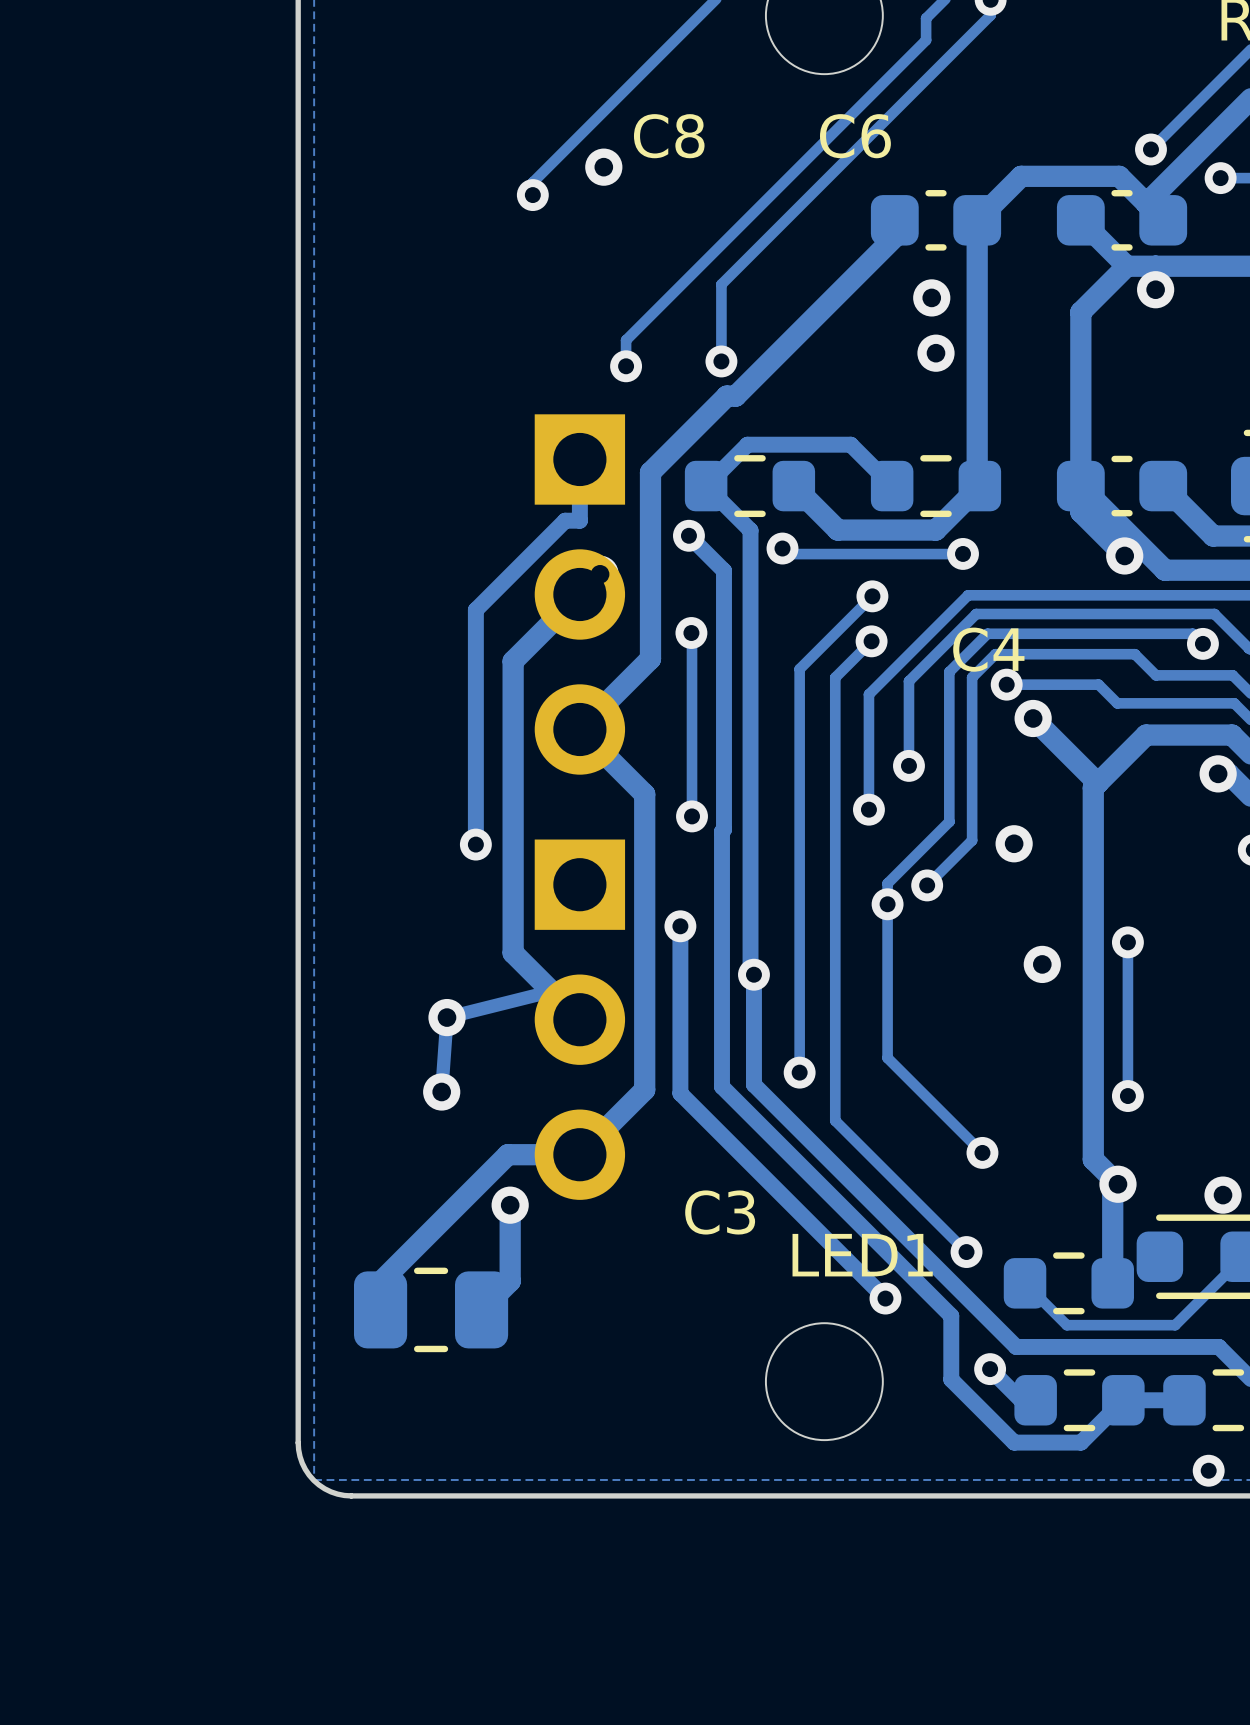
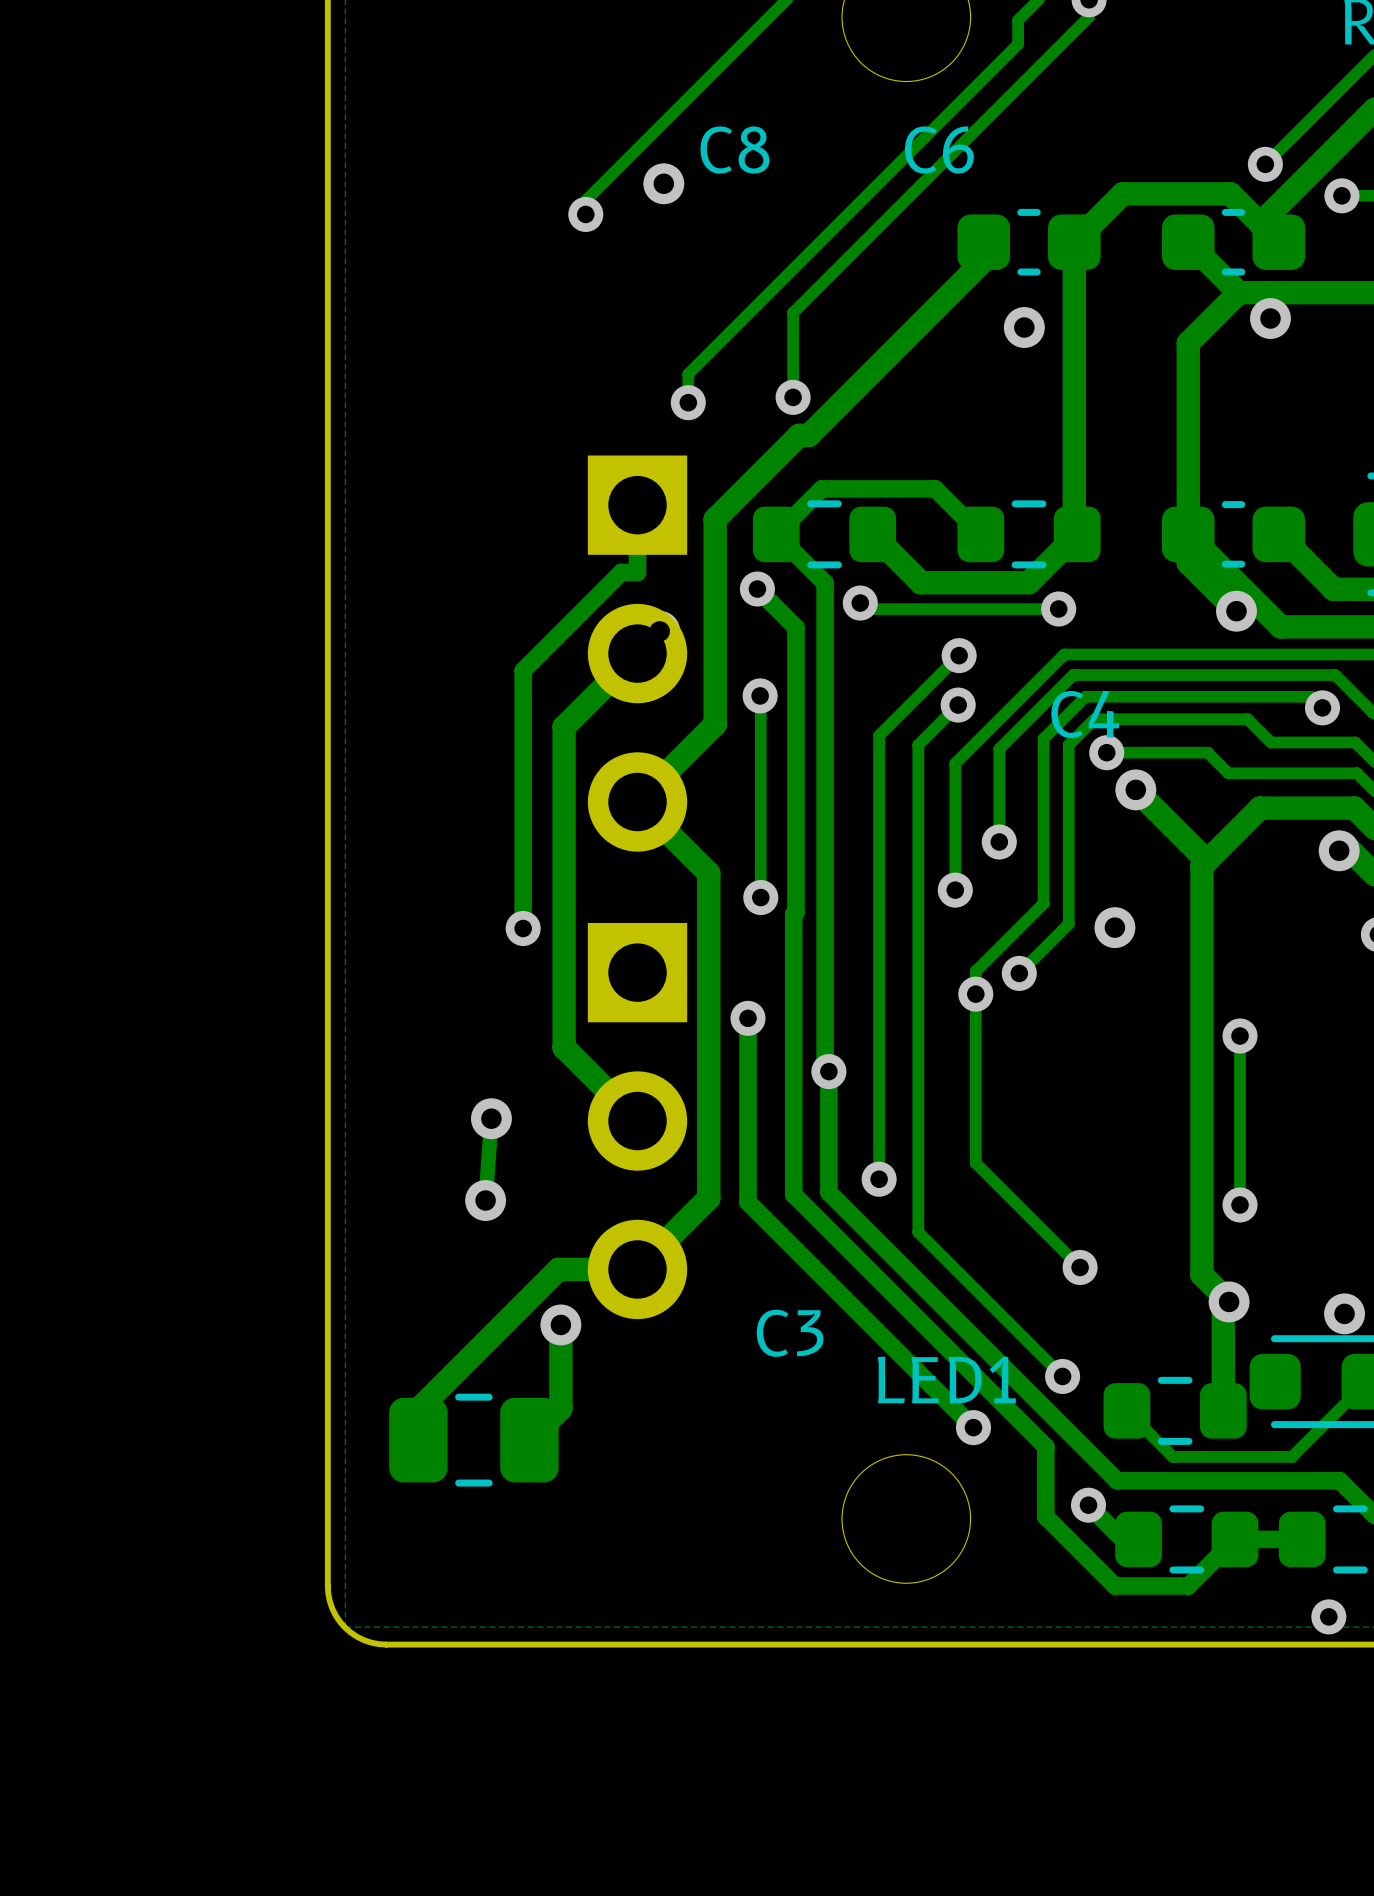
via: (936, 353) -> none
via: (1042, 964) -> none
track: (553, 991) (447, 1017) -> none

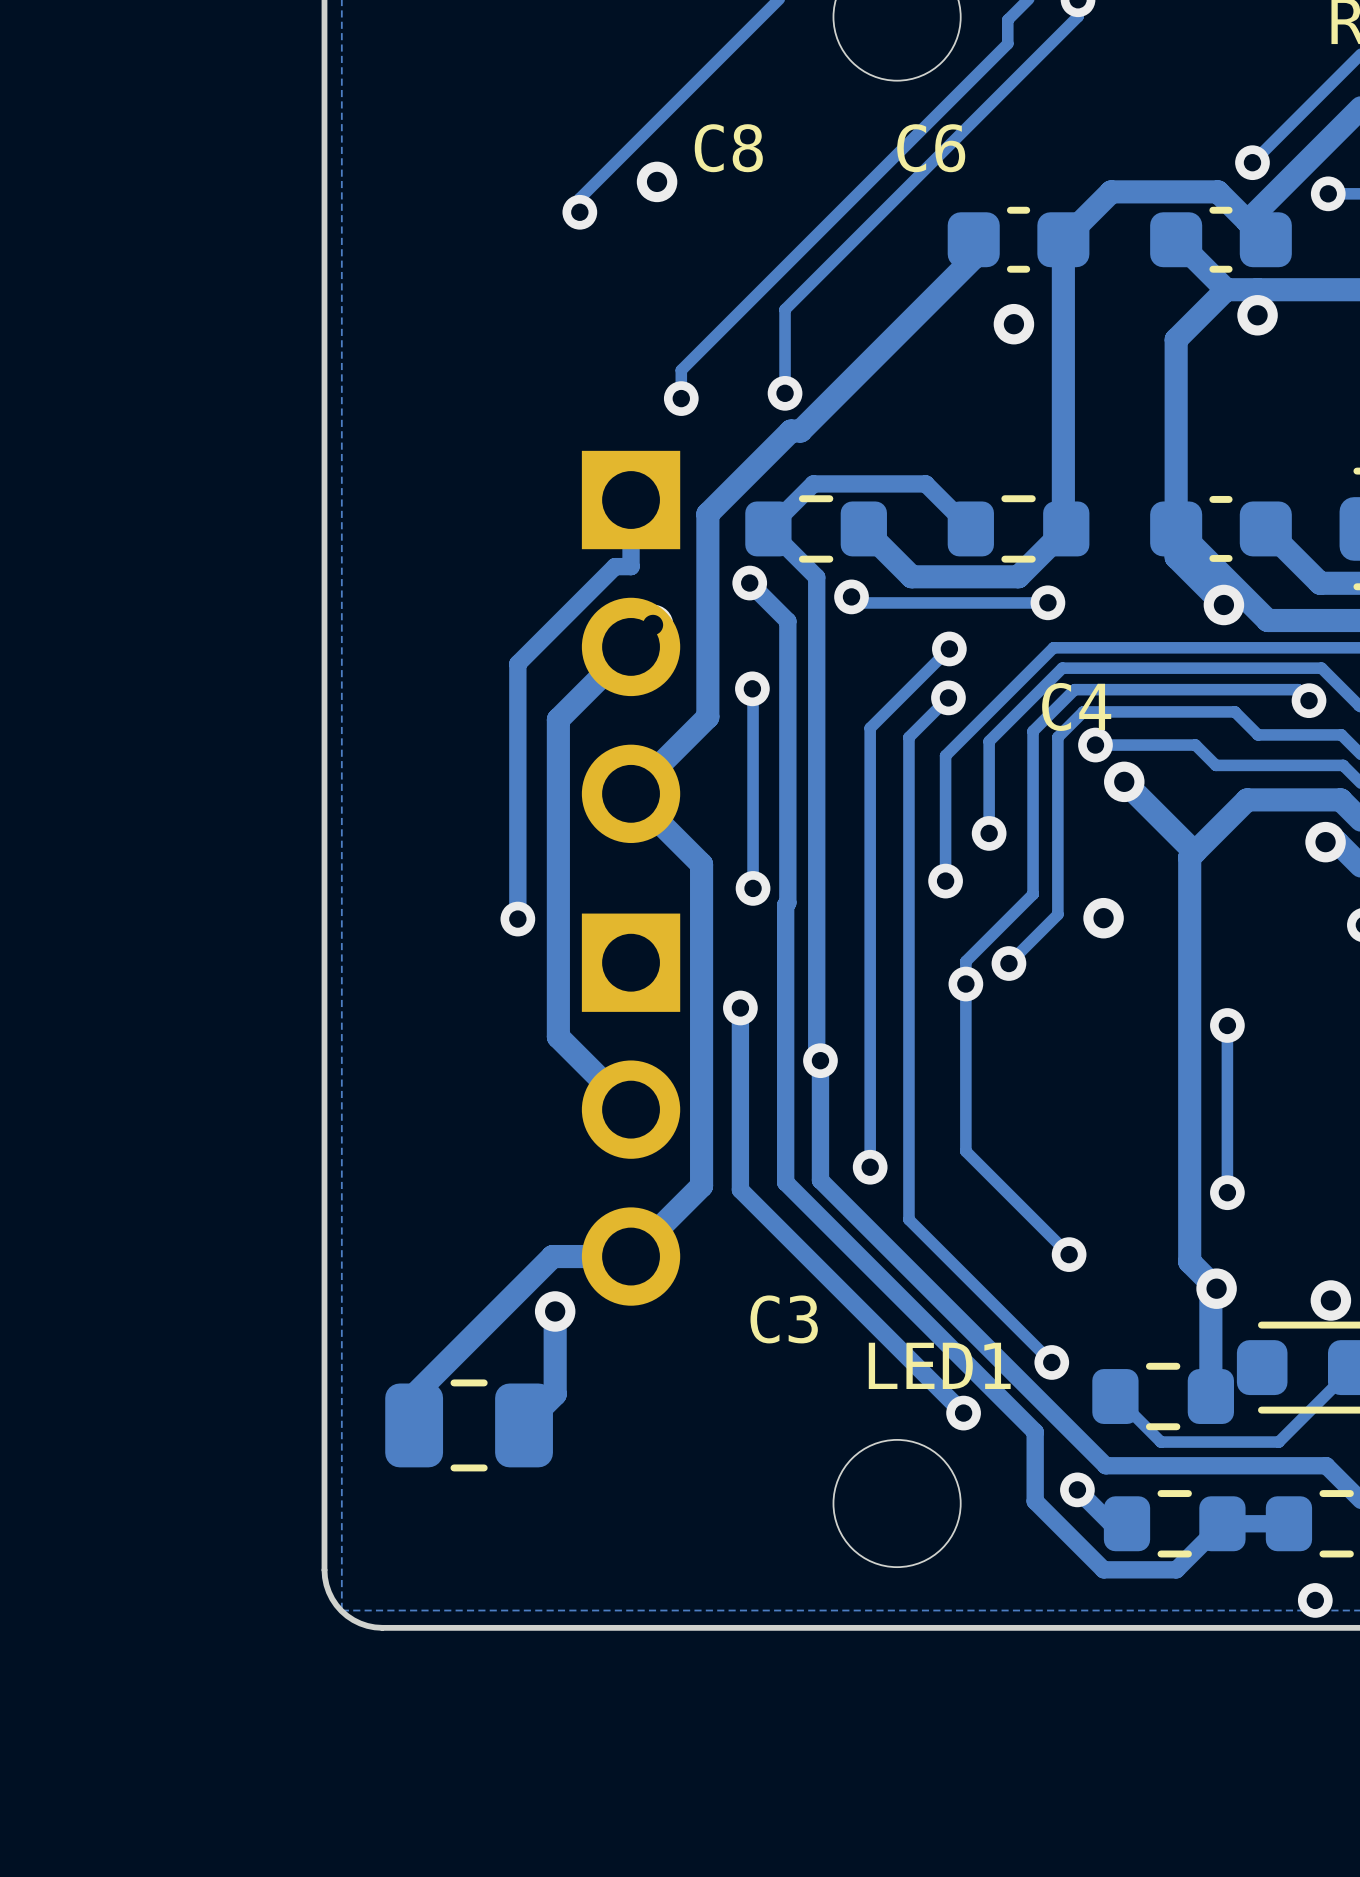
track: (491, 1118) (485, 1200) -> none
via: (491, 1118) -> none
via: (485, 1200) -> none

